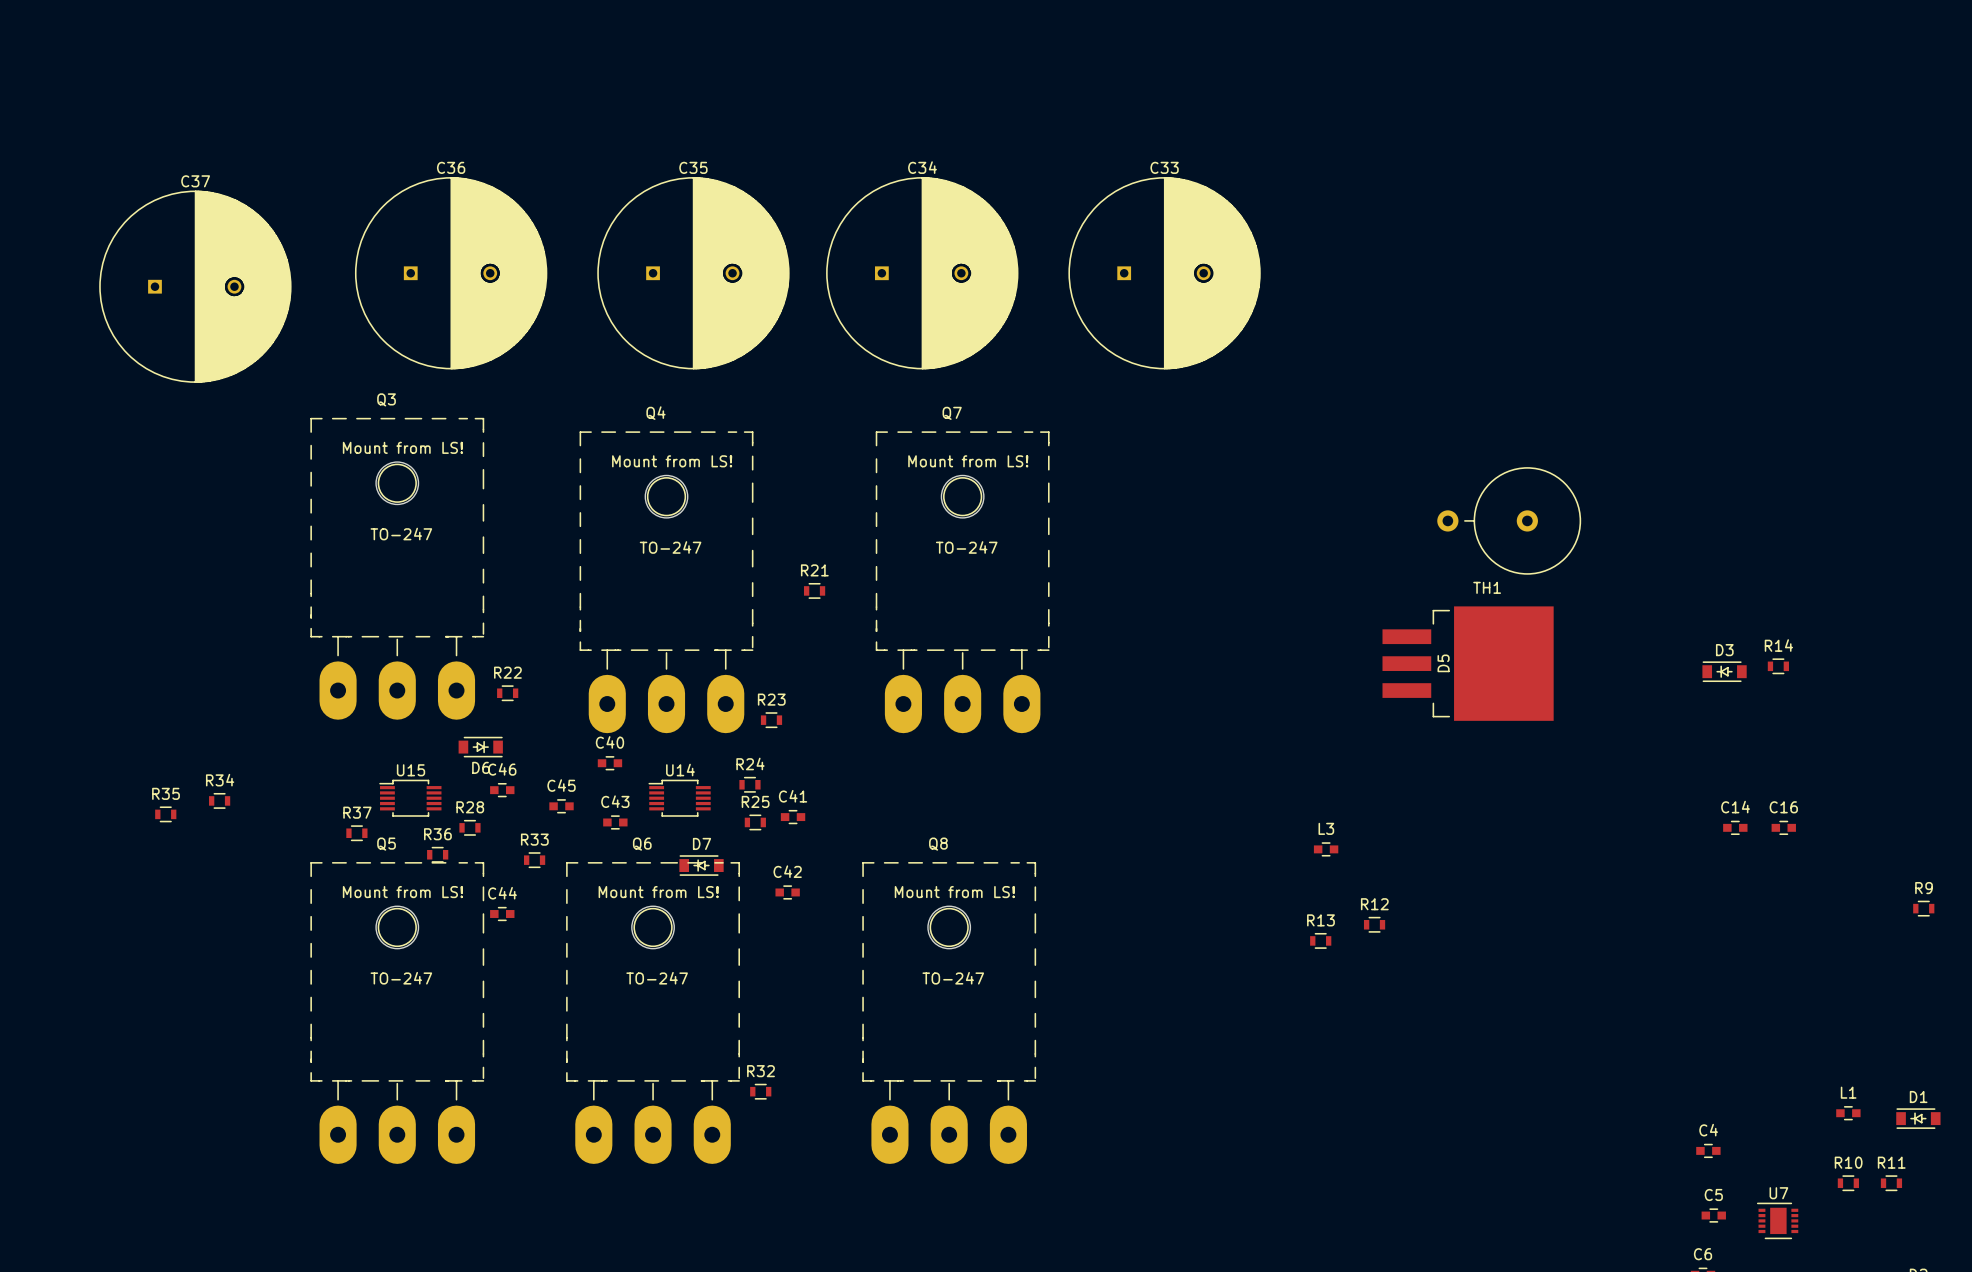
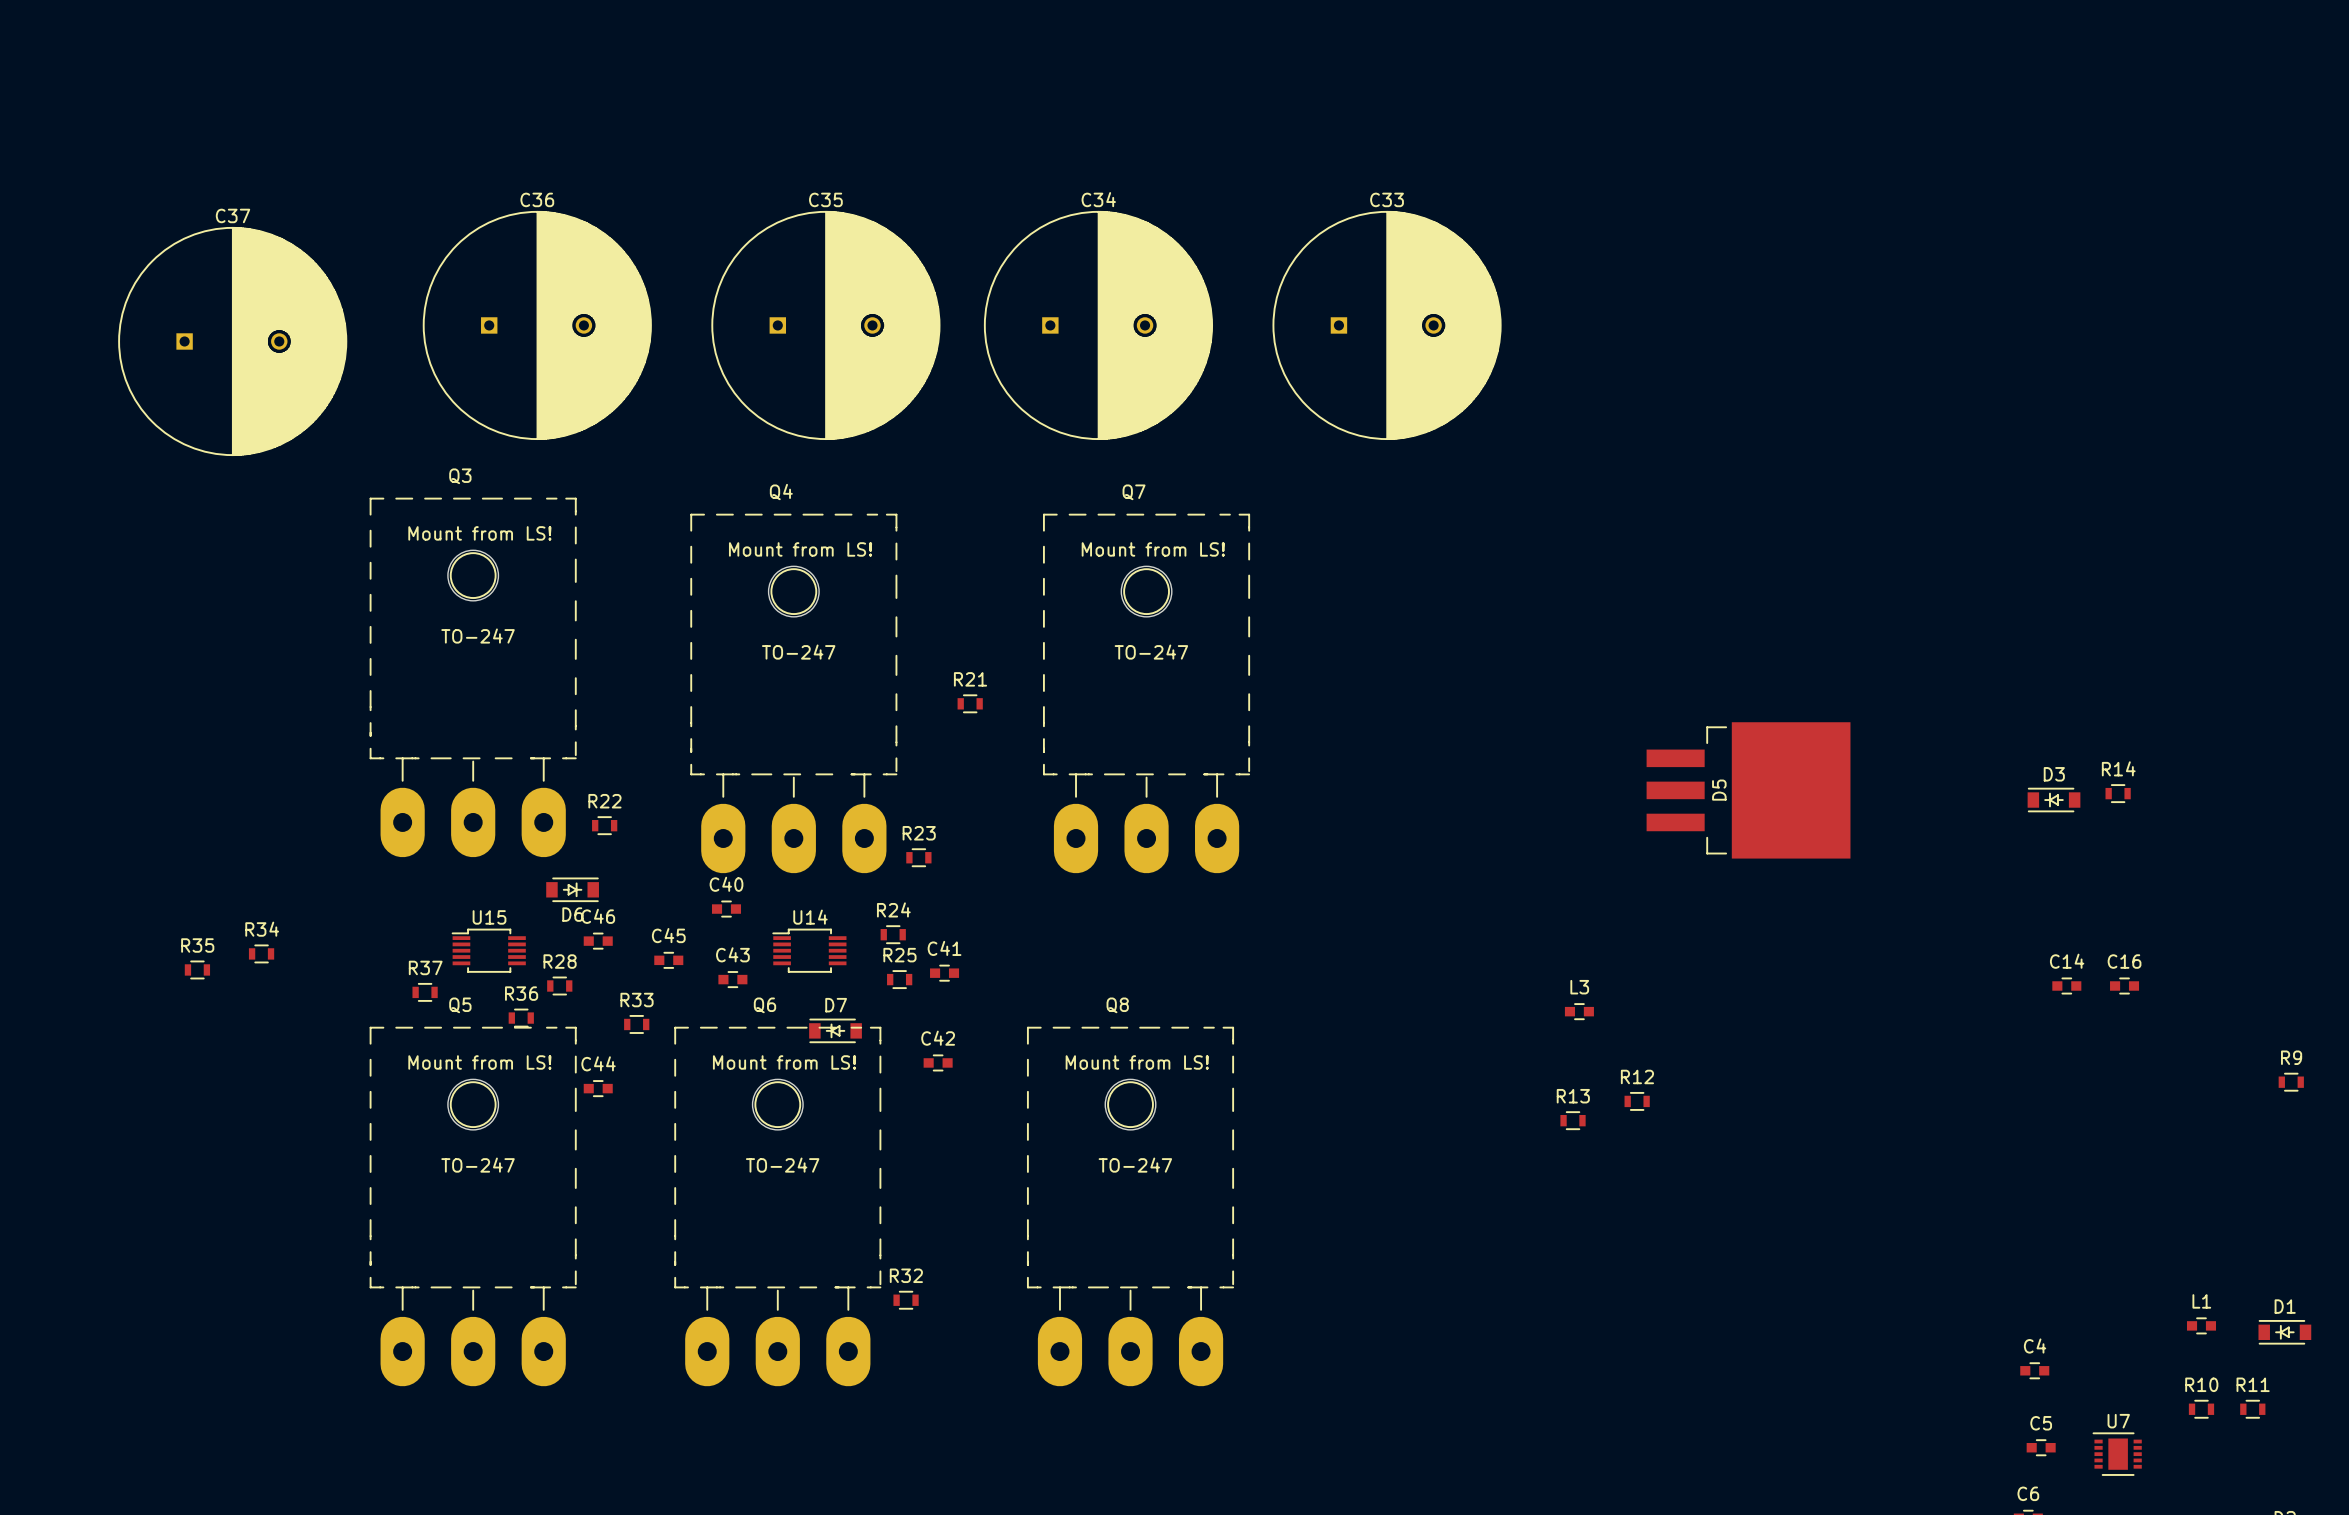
TH1: (1509, 520) -> none

